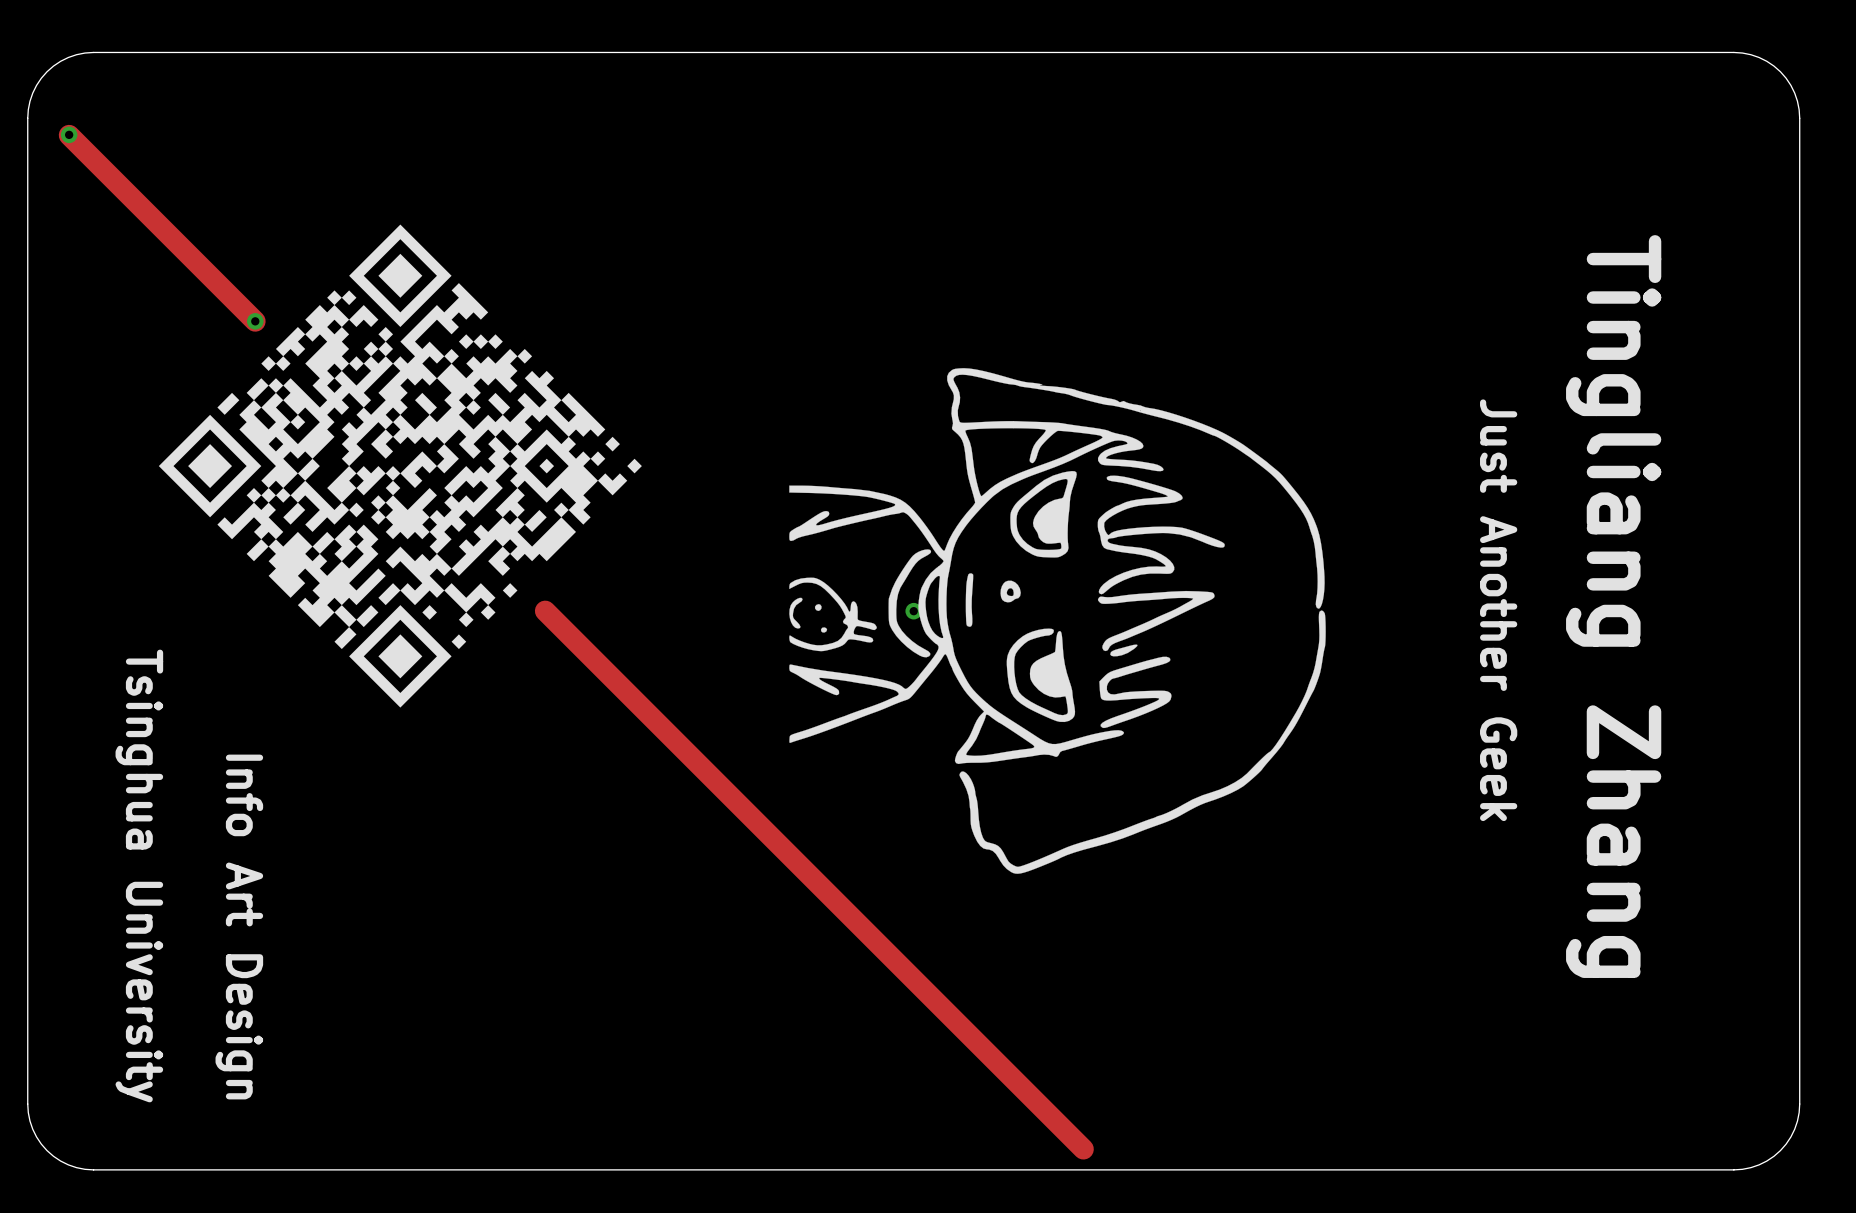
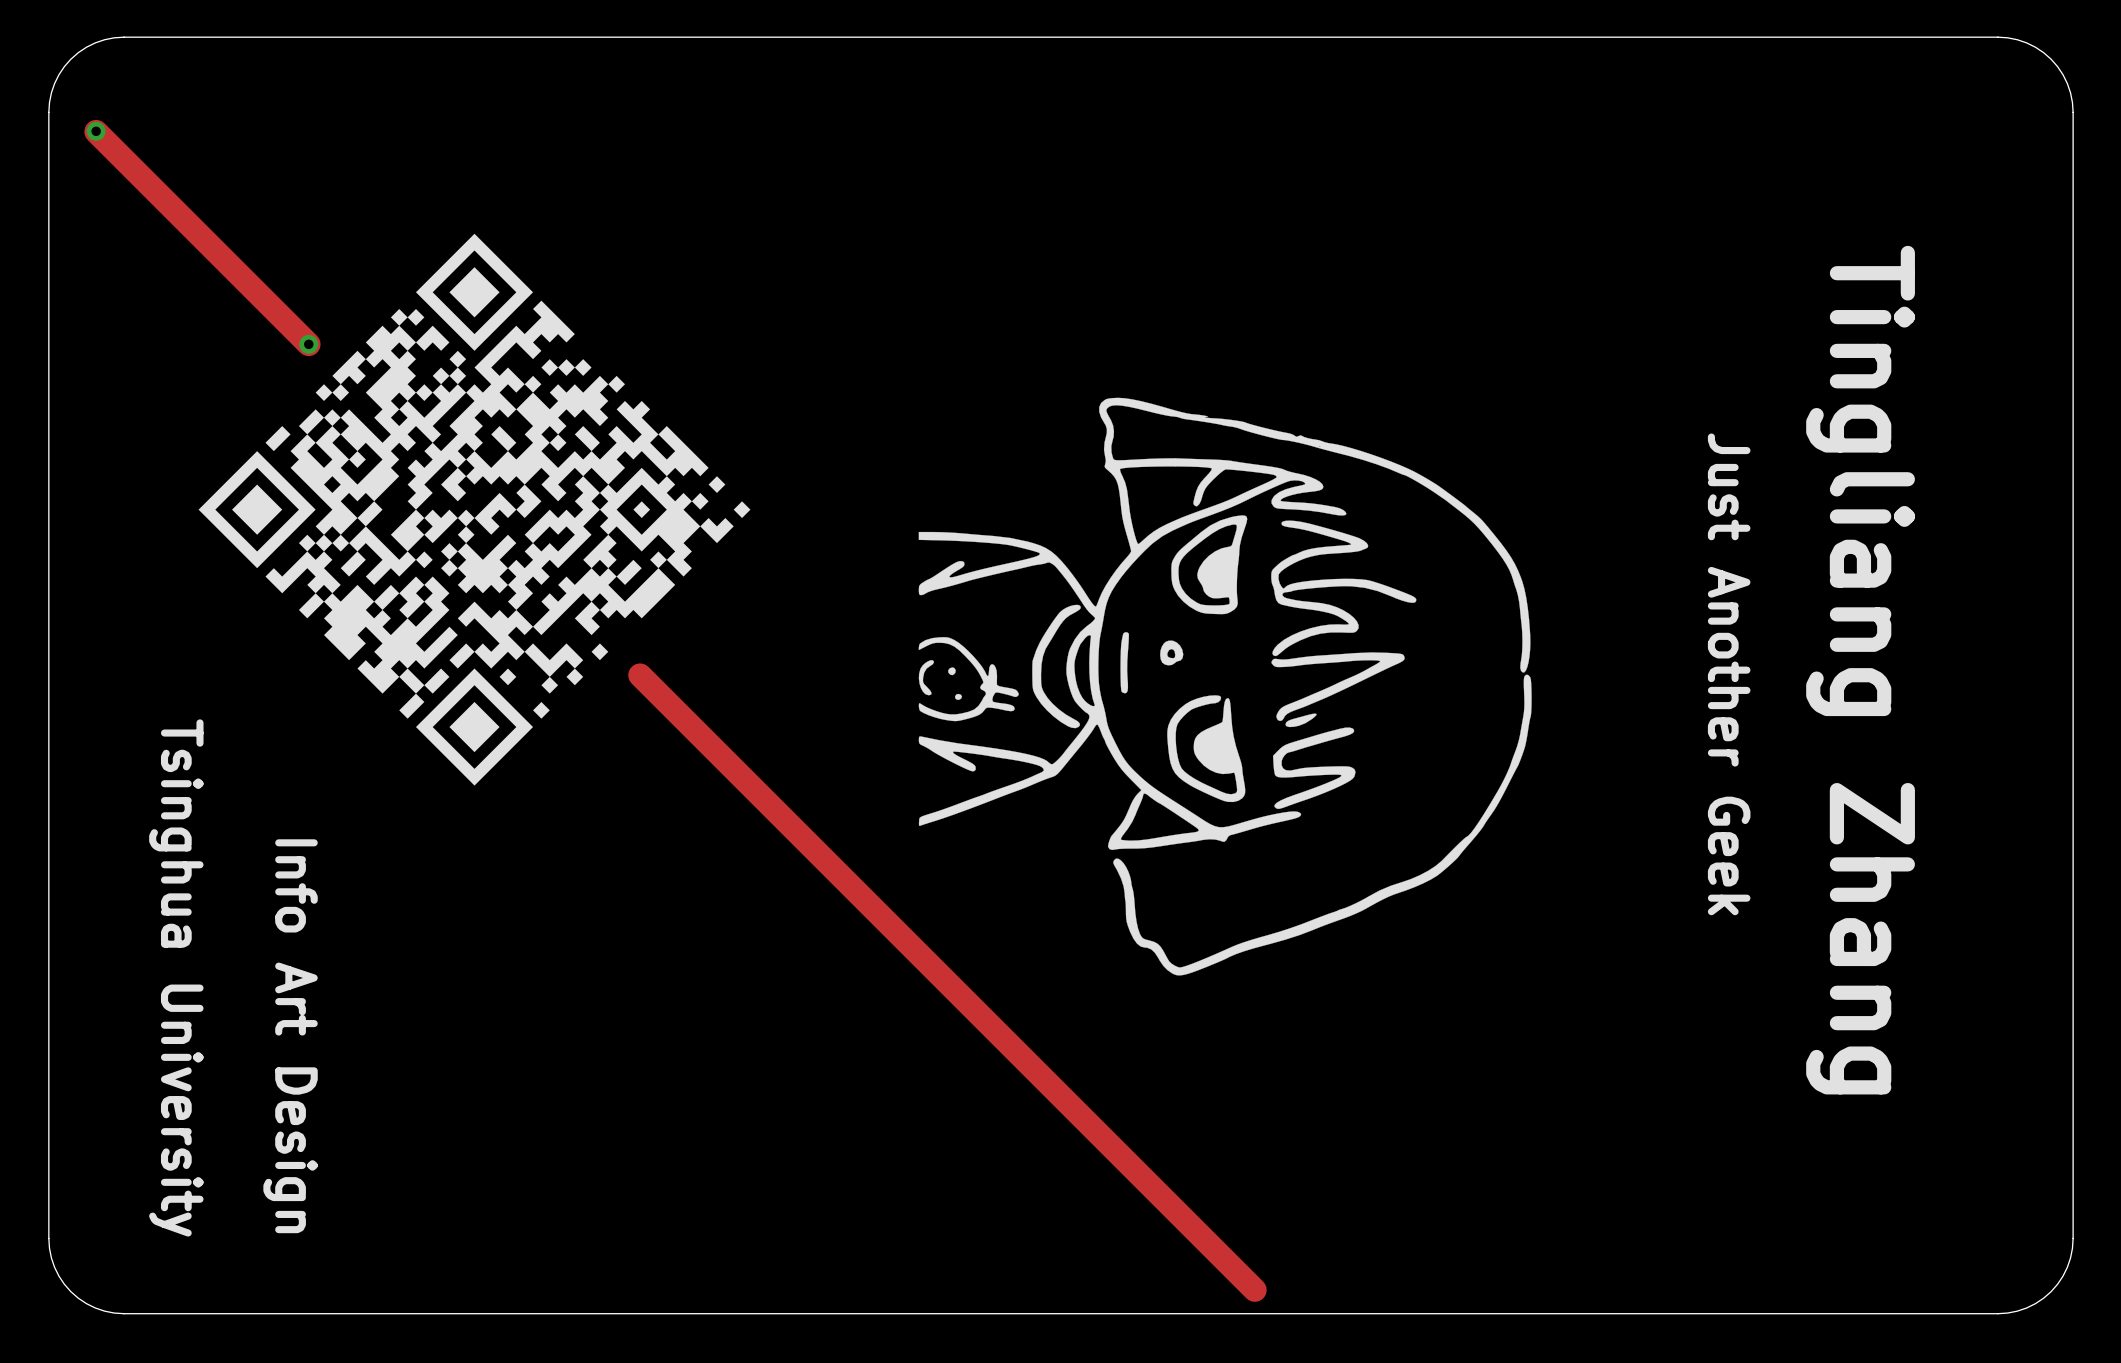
via: (913, 611) -> none

